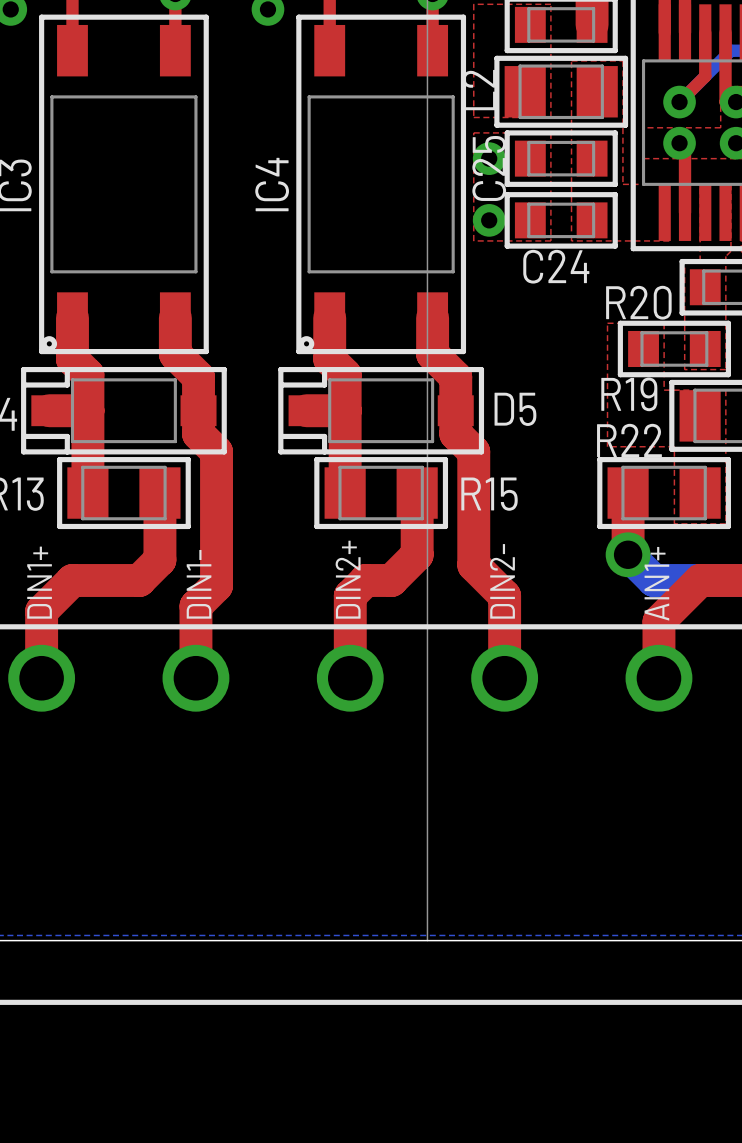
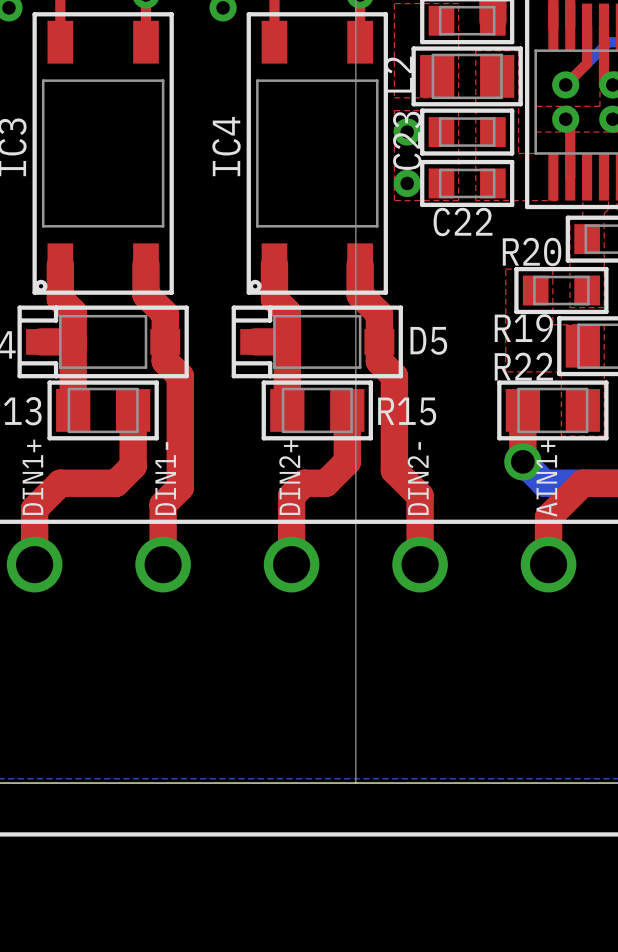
C25 name: C25 (489, 168) -> C23 (407, 140)
C24 name: C24 (556, 266) -> C22 (463, 222)

